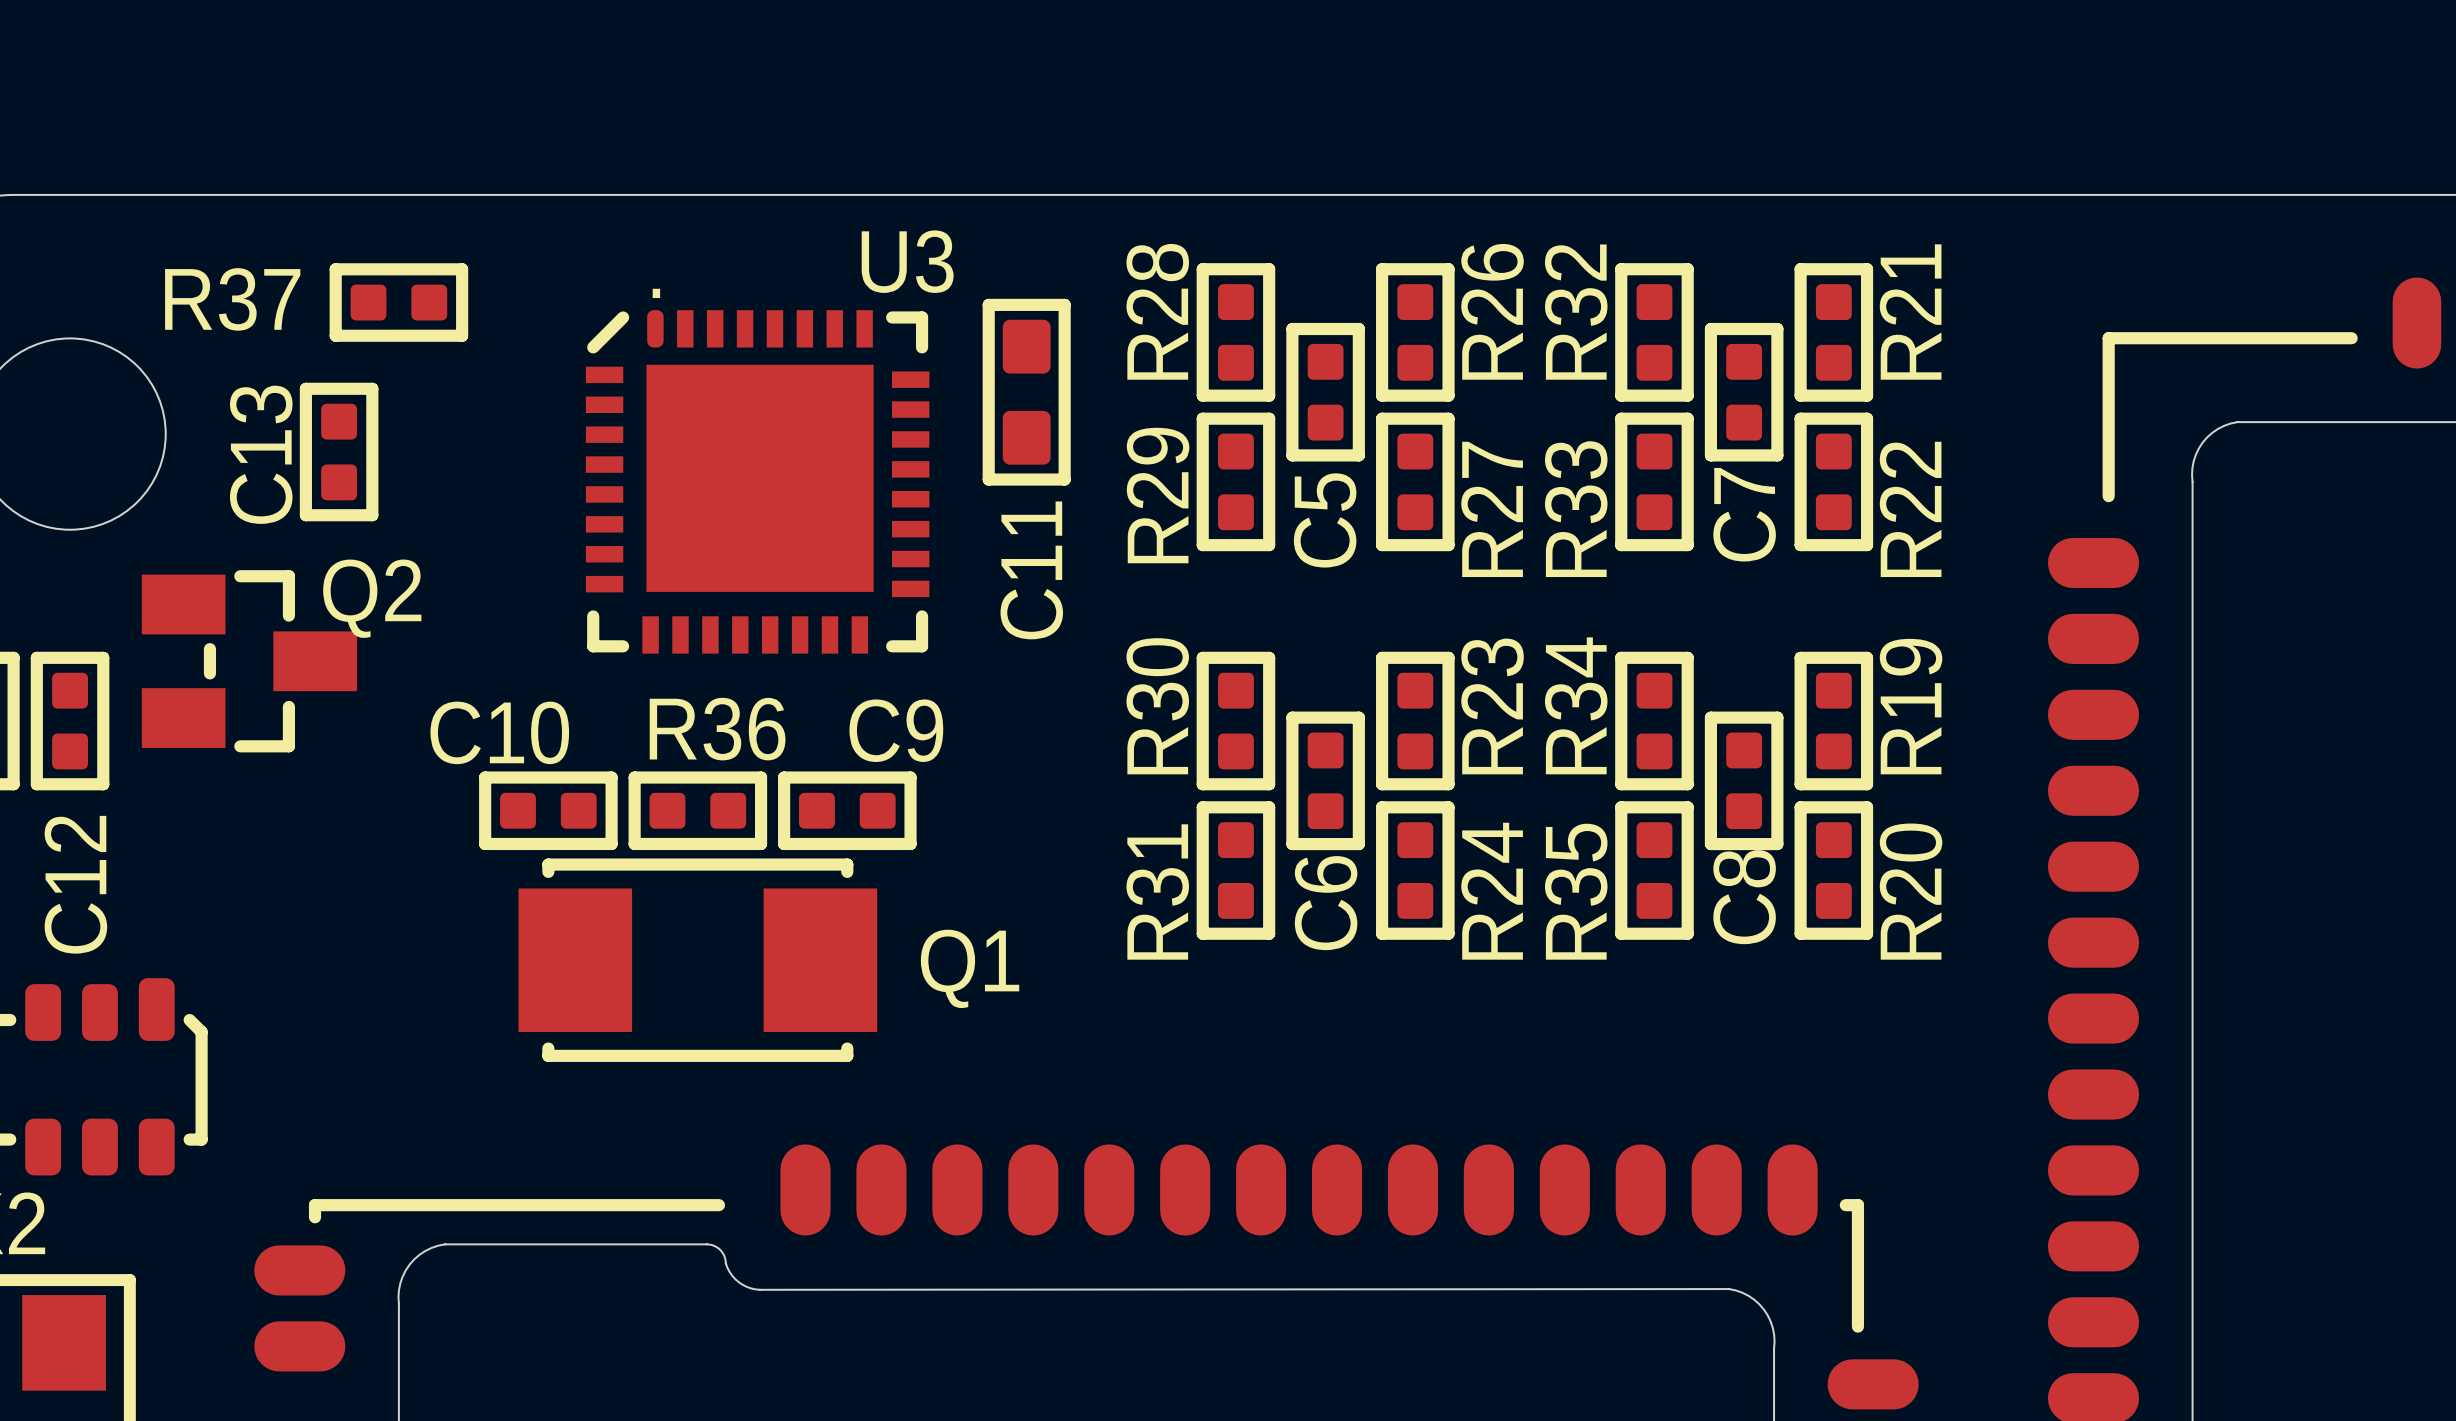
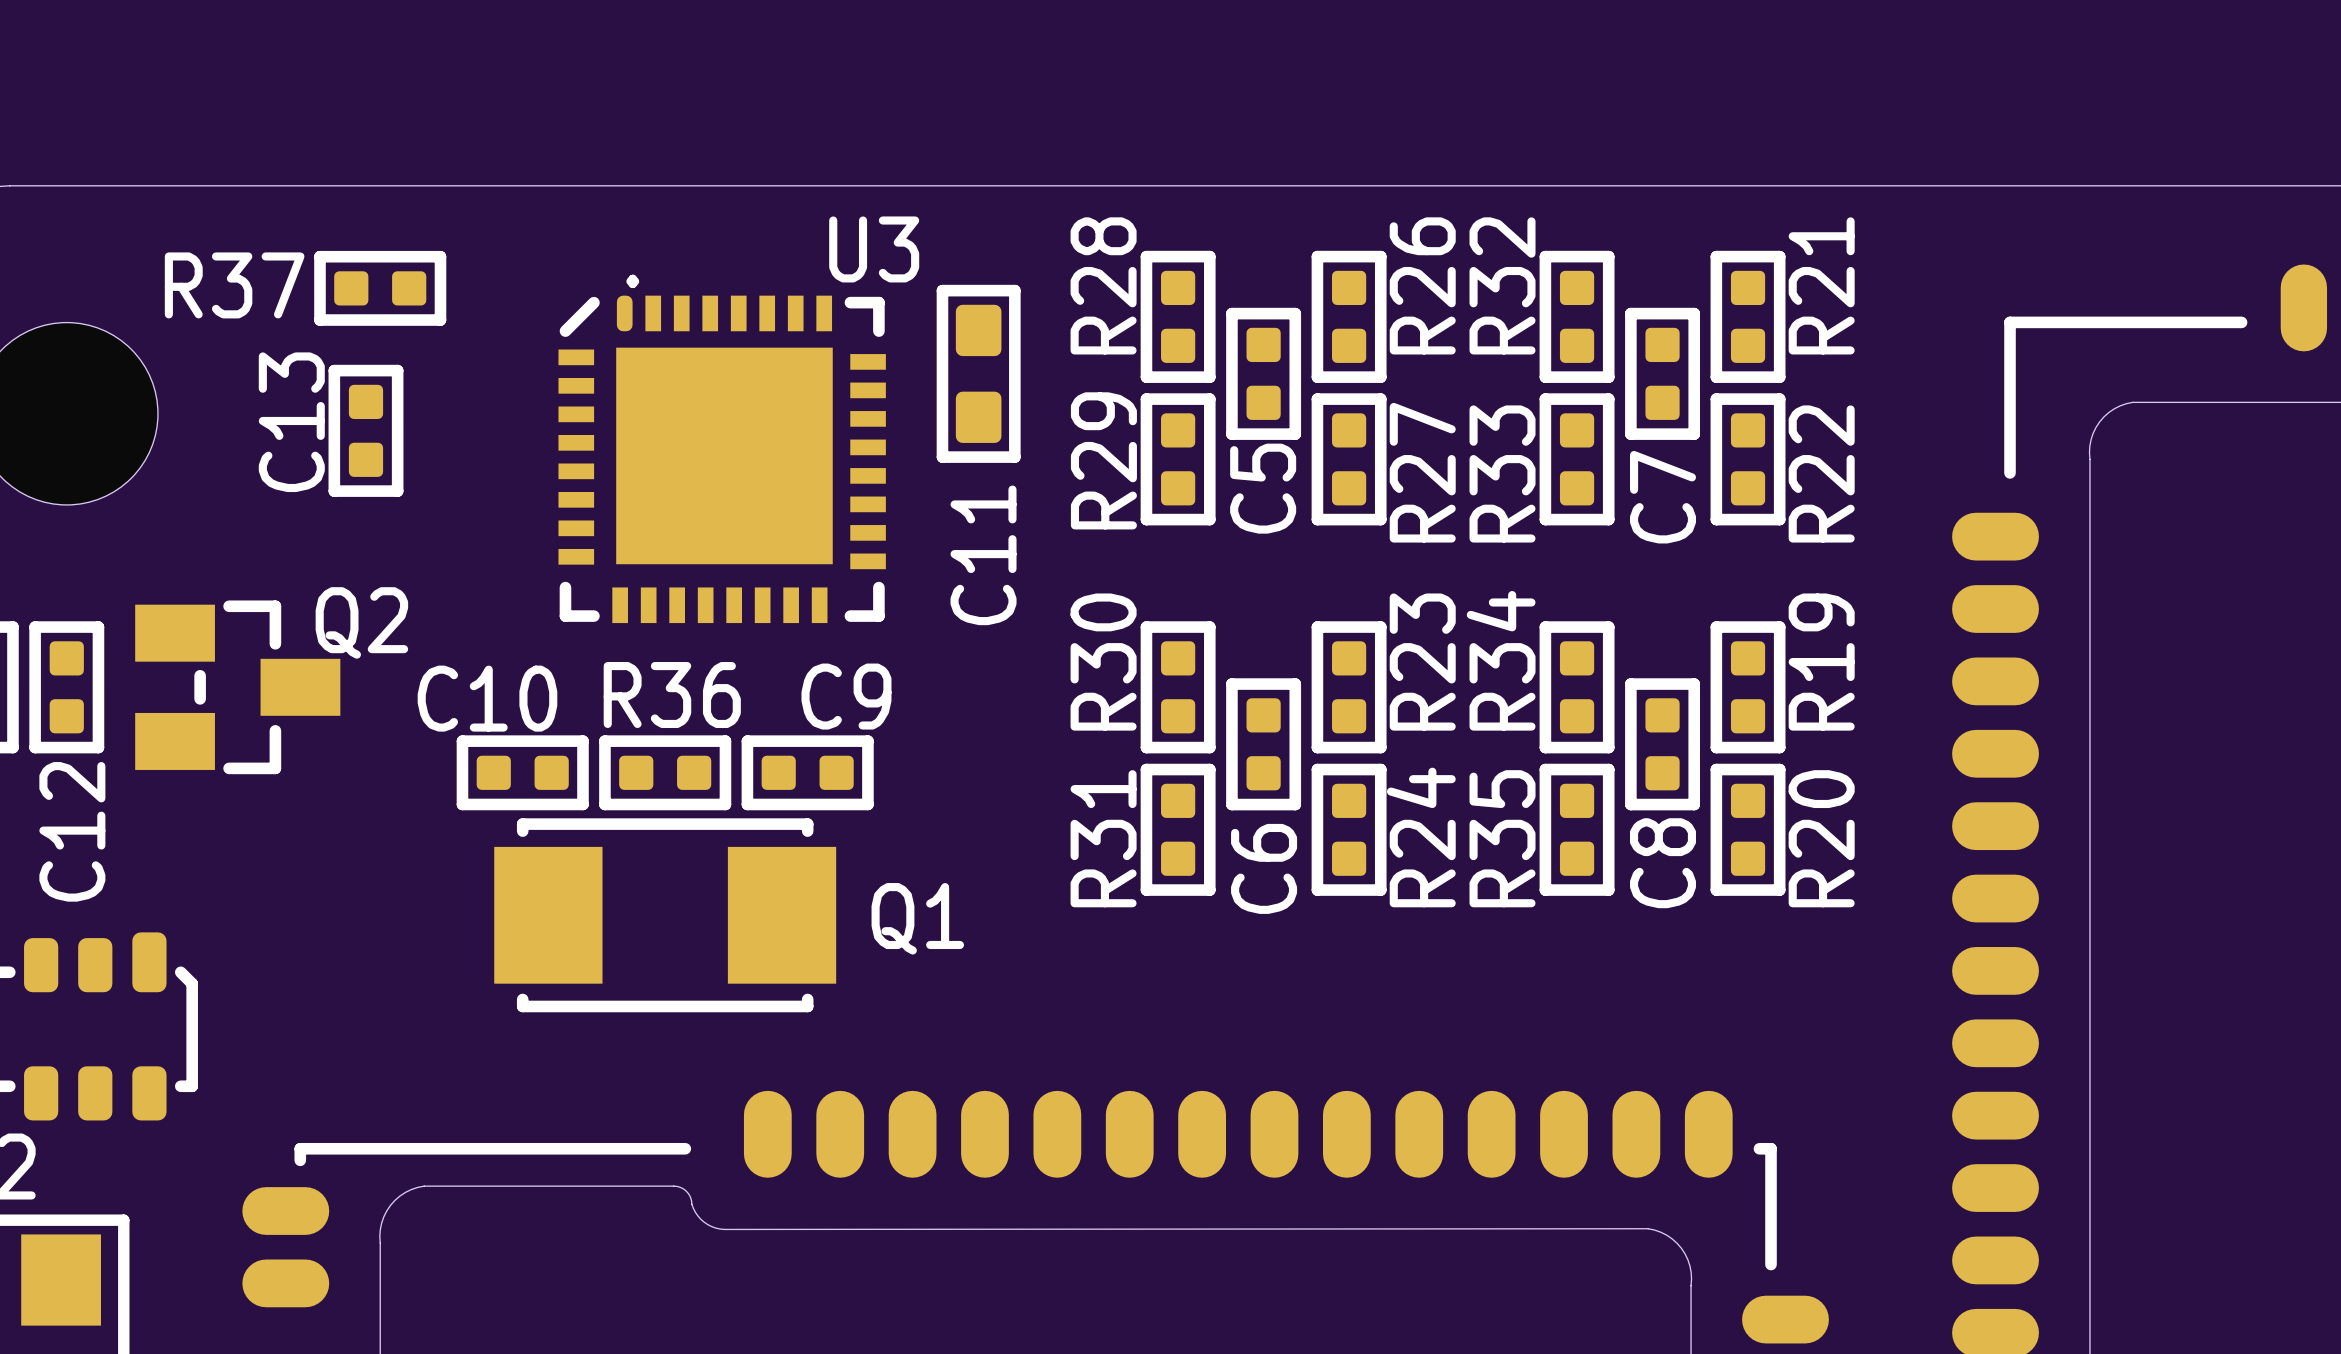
C13 position: (339, 452) -> (365, 430)
Q2 position: (249, 661) -> (237, 687)

